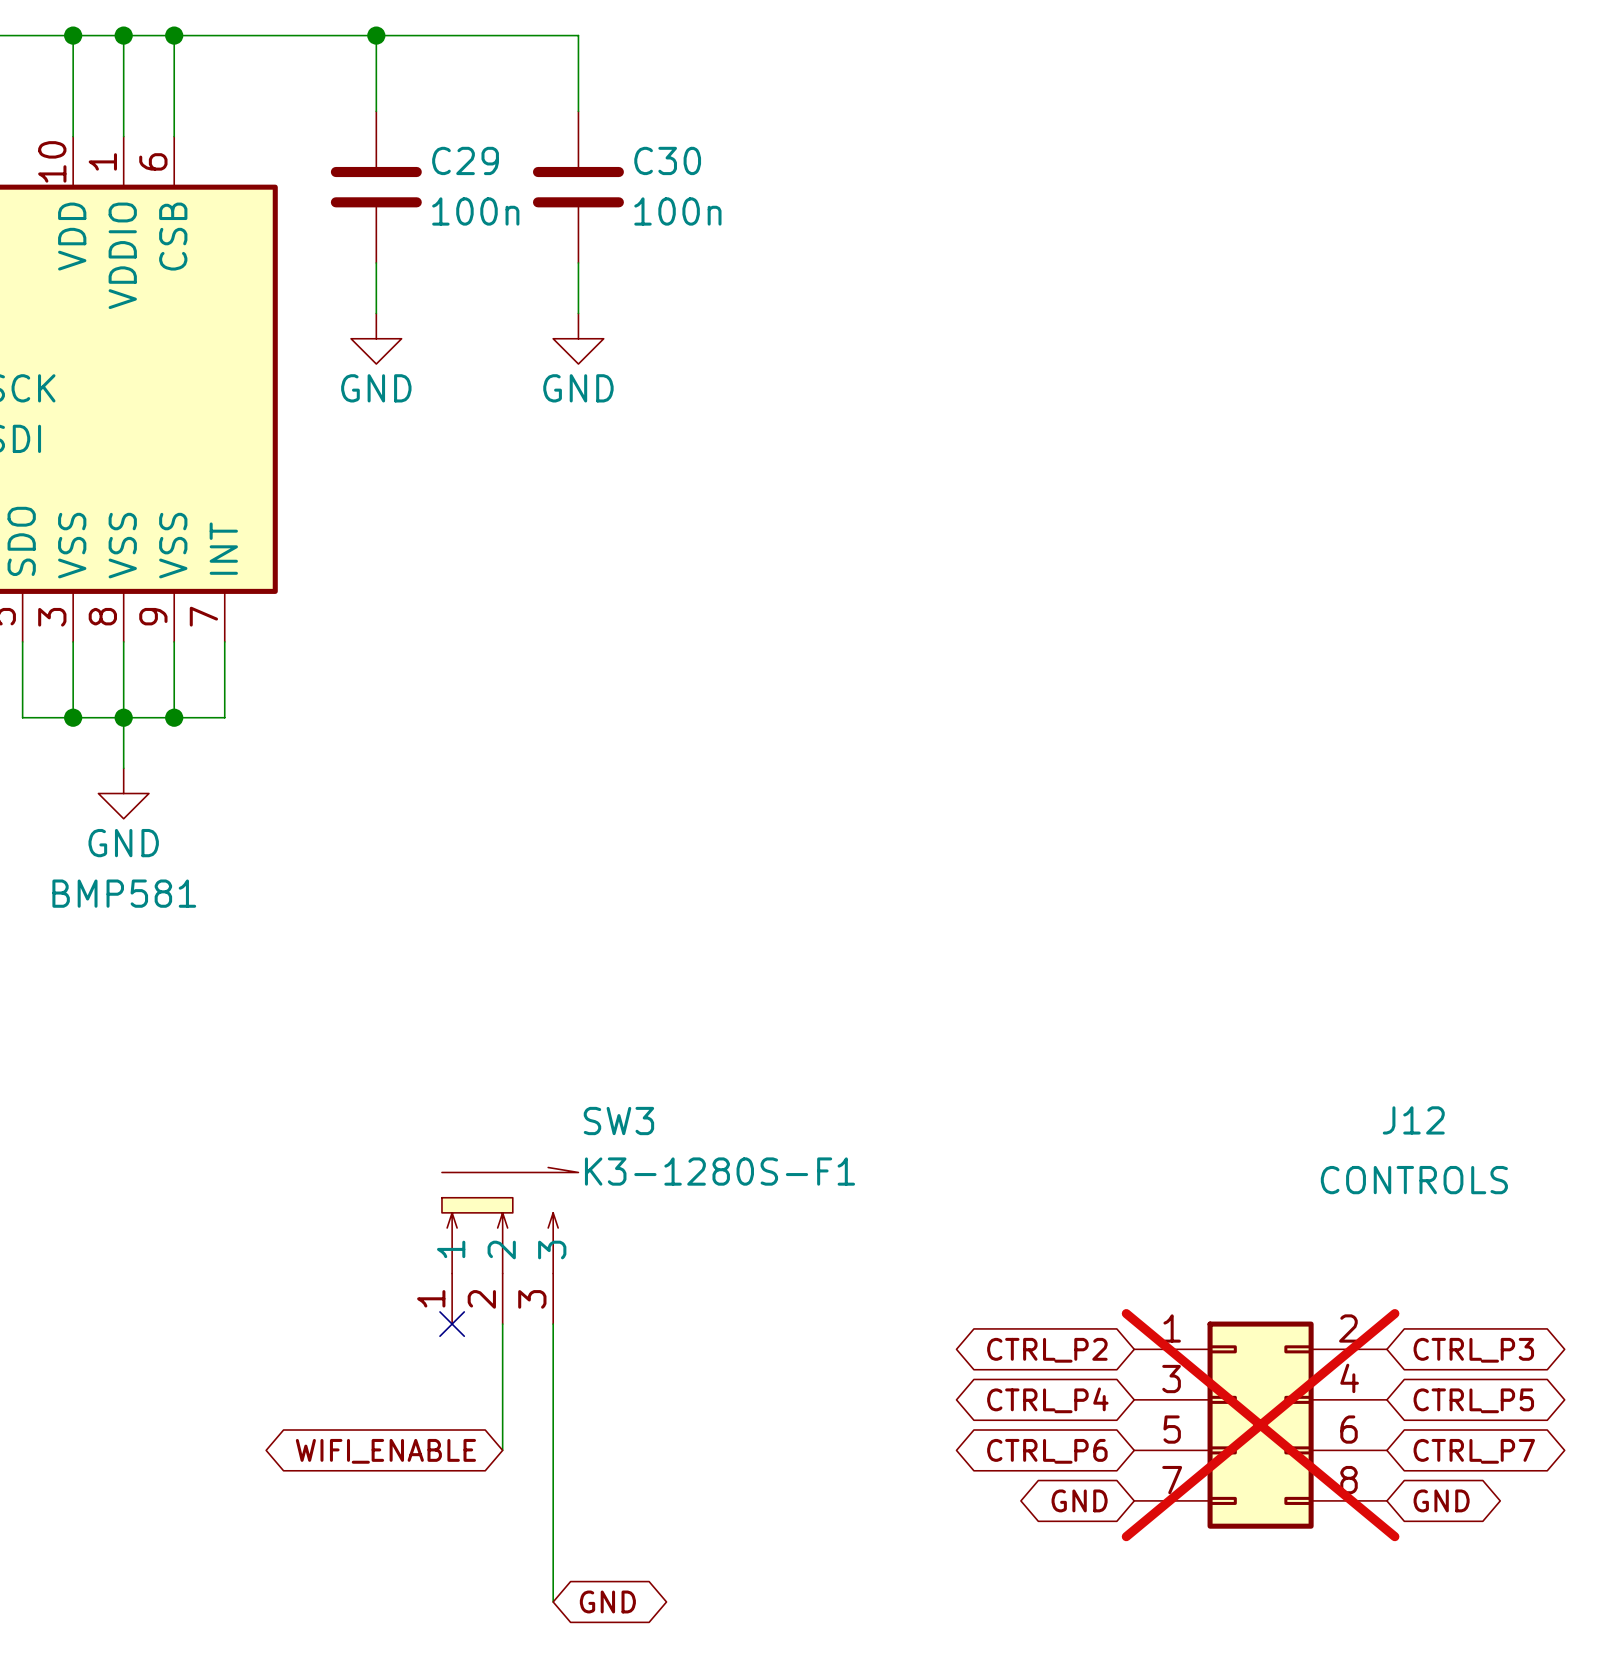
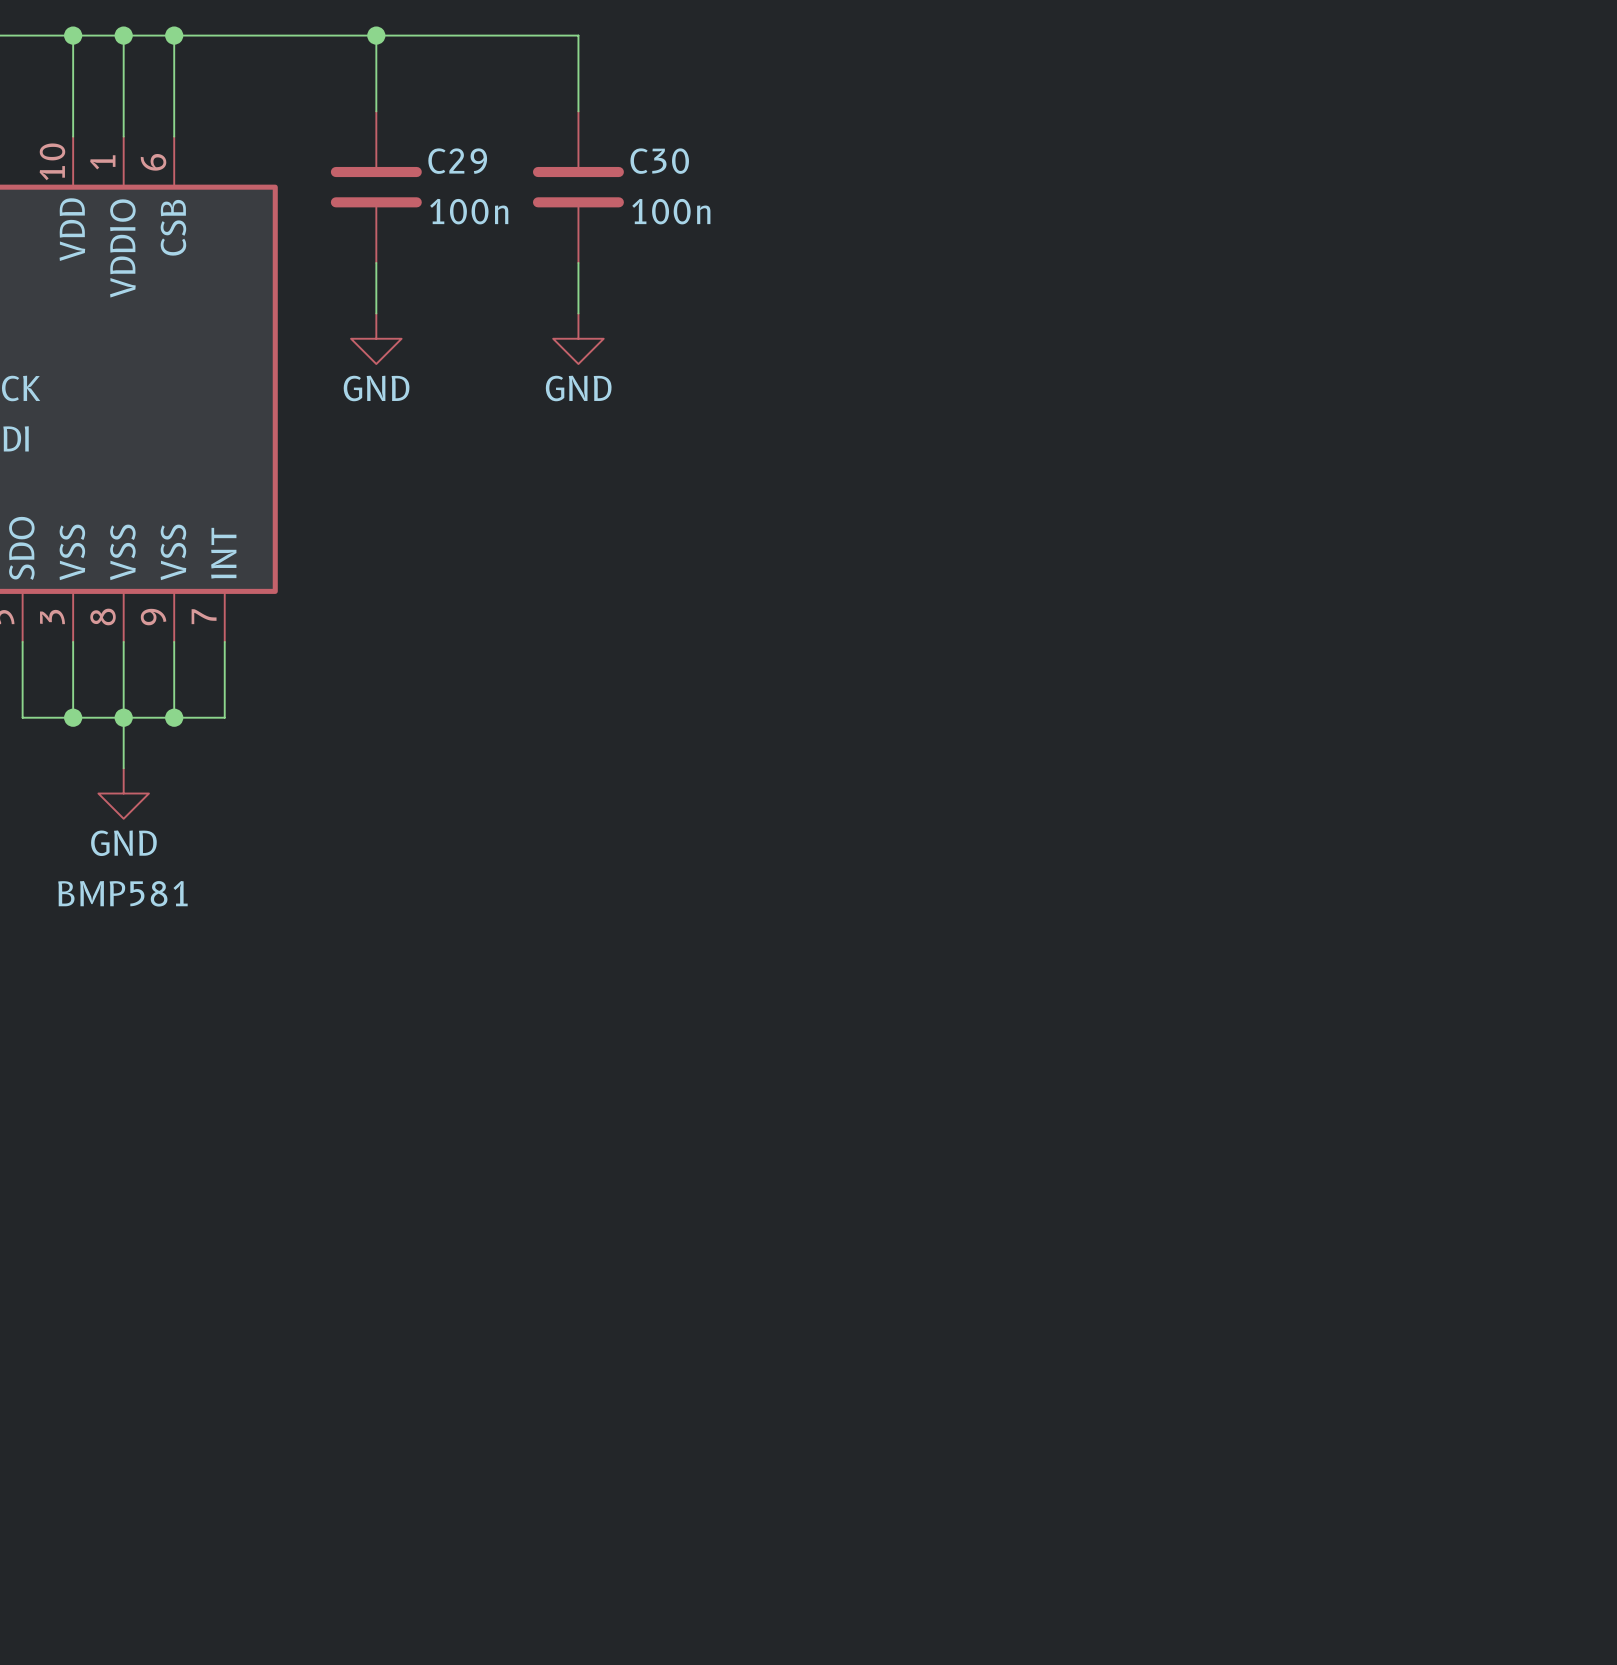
SW3: K3-1280S-F1 (510, 1245) -> none
no-connect mark: (452, 1324) -> none
wire: (502, 1324) (502, 1450) -> none
wire: (553, 1324) (553, 1601) -> none
global label: CTRL_P2 (1047, 1350) -> none
global label: CTRL_P3 (1473, 1350) -> none
global label: CTRL_P4 (1047, 1400) -> none
global label: CTRL_P5 (1473, 1400) -> none
J12: CONTROLS (1260, 1425) -> none
global label: WIFI_ENABLE (385, 1451) -> none
global label: CTRL_P6 (1047, 1451) -> none
global label: CTRL_P7 (1474, 1451) -> none
global label: GND (1079, 1500) -> none
global label: GND (1441, 1500) -> none
global label: GND (607, 1601) -> none

